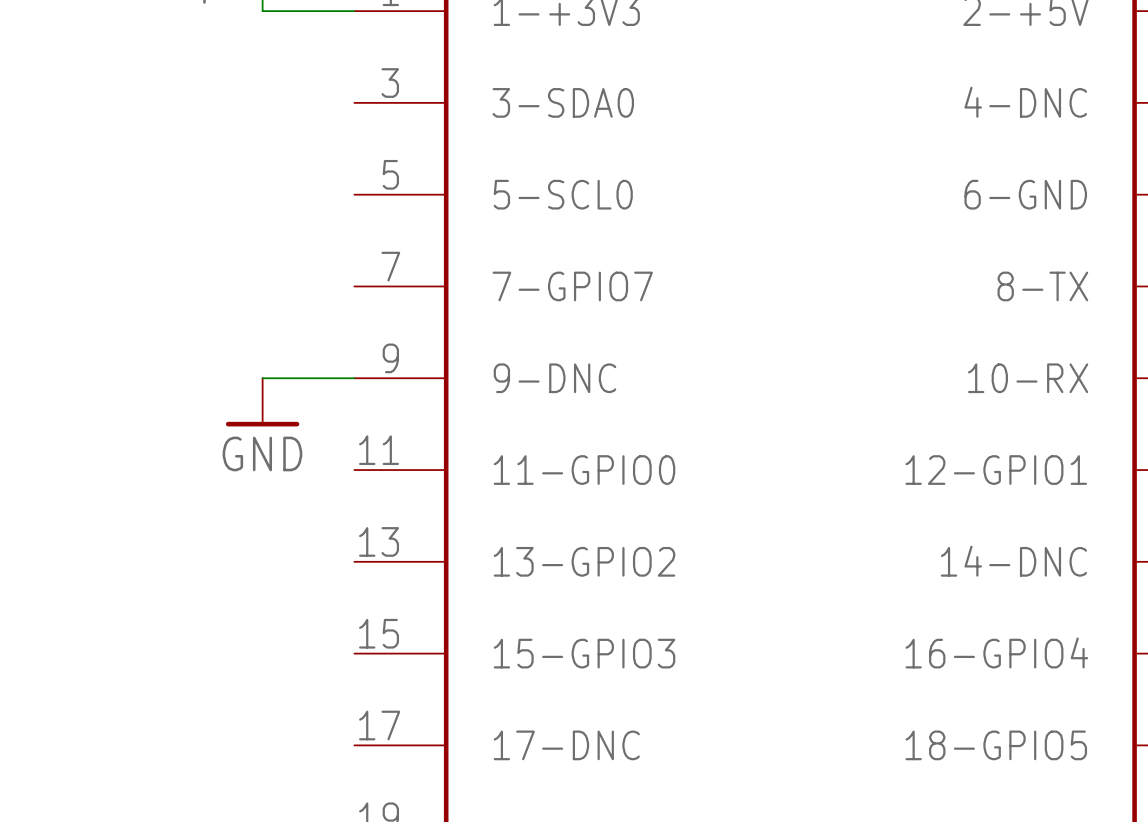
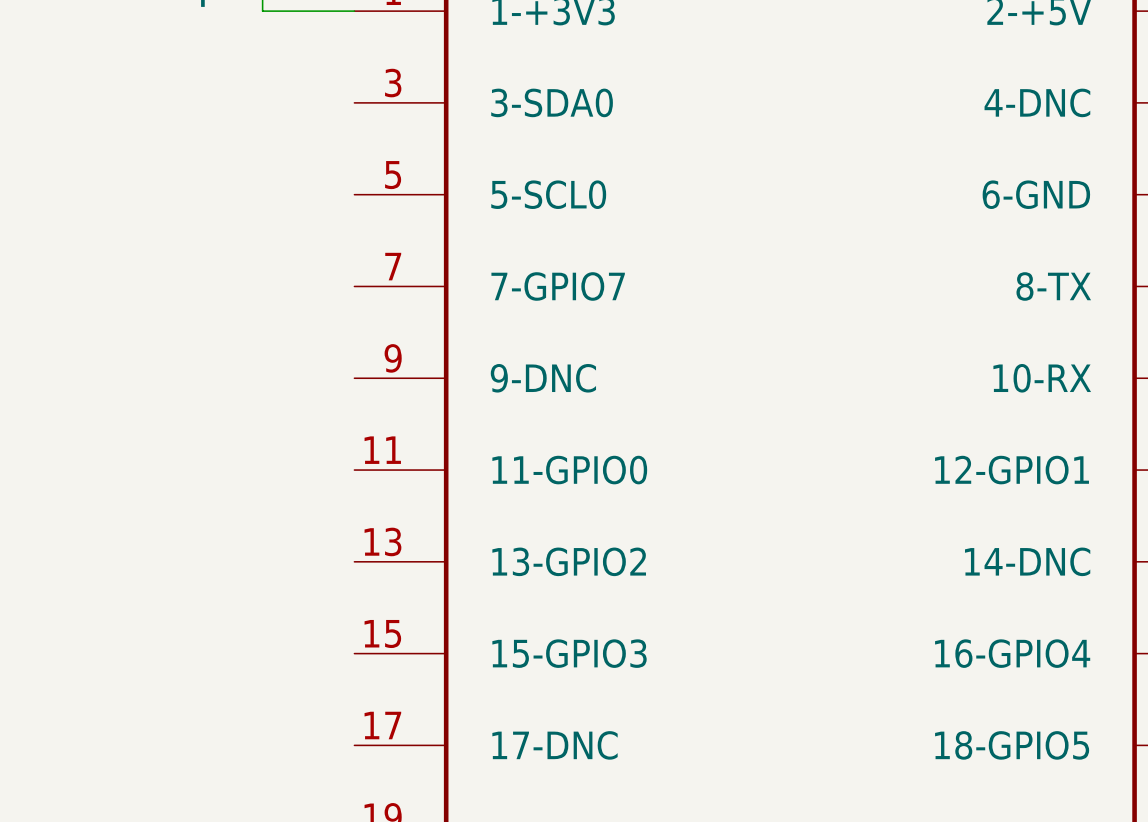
wire: (262, 378) (354, 378) -> none
power symbol: GND (262, 402) -> none

